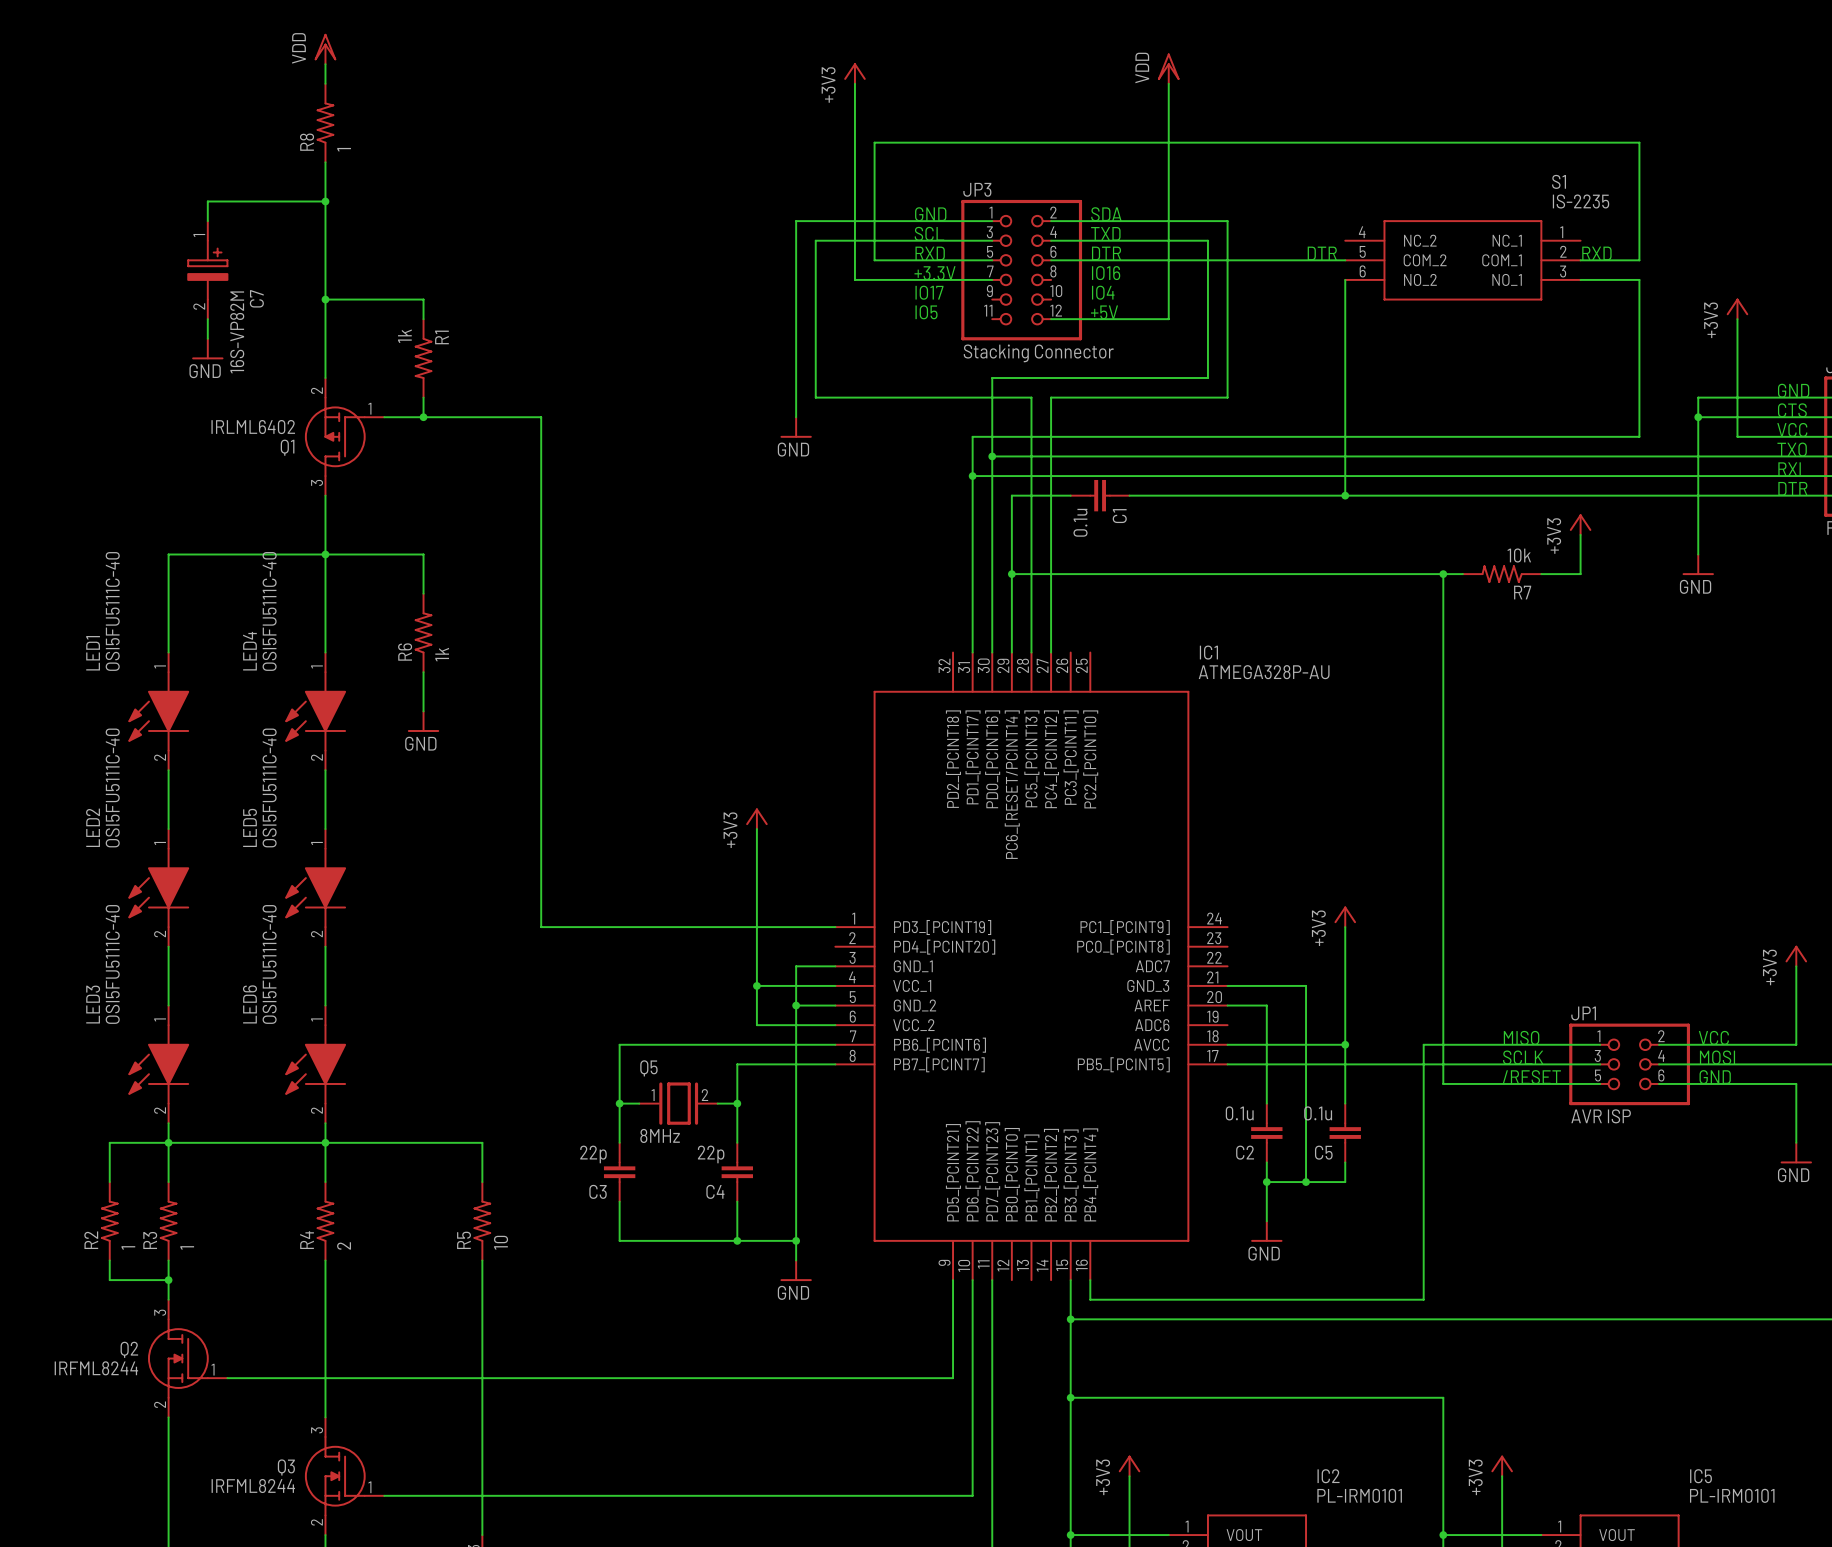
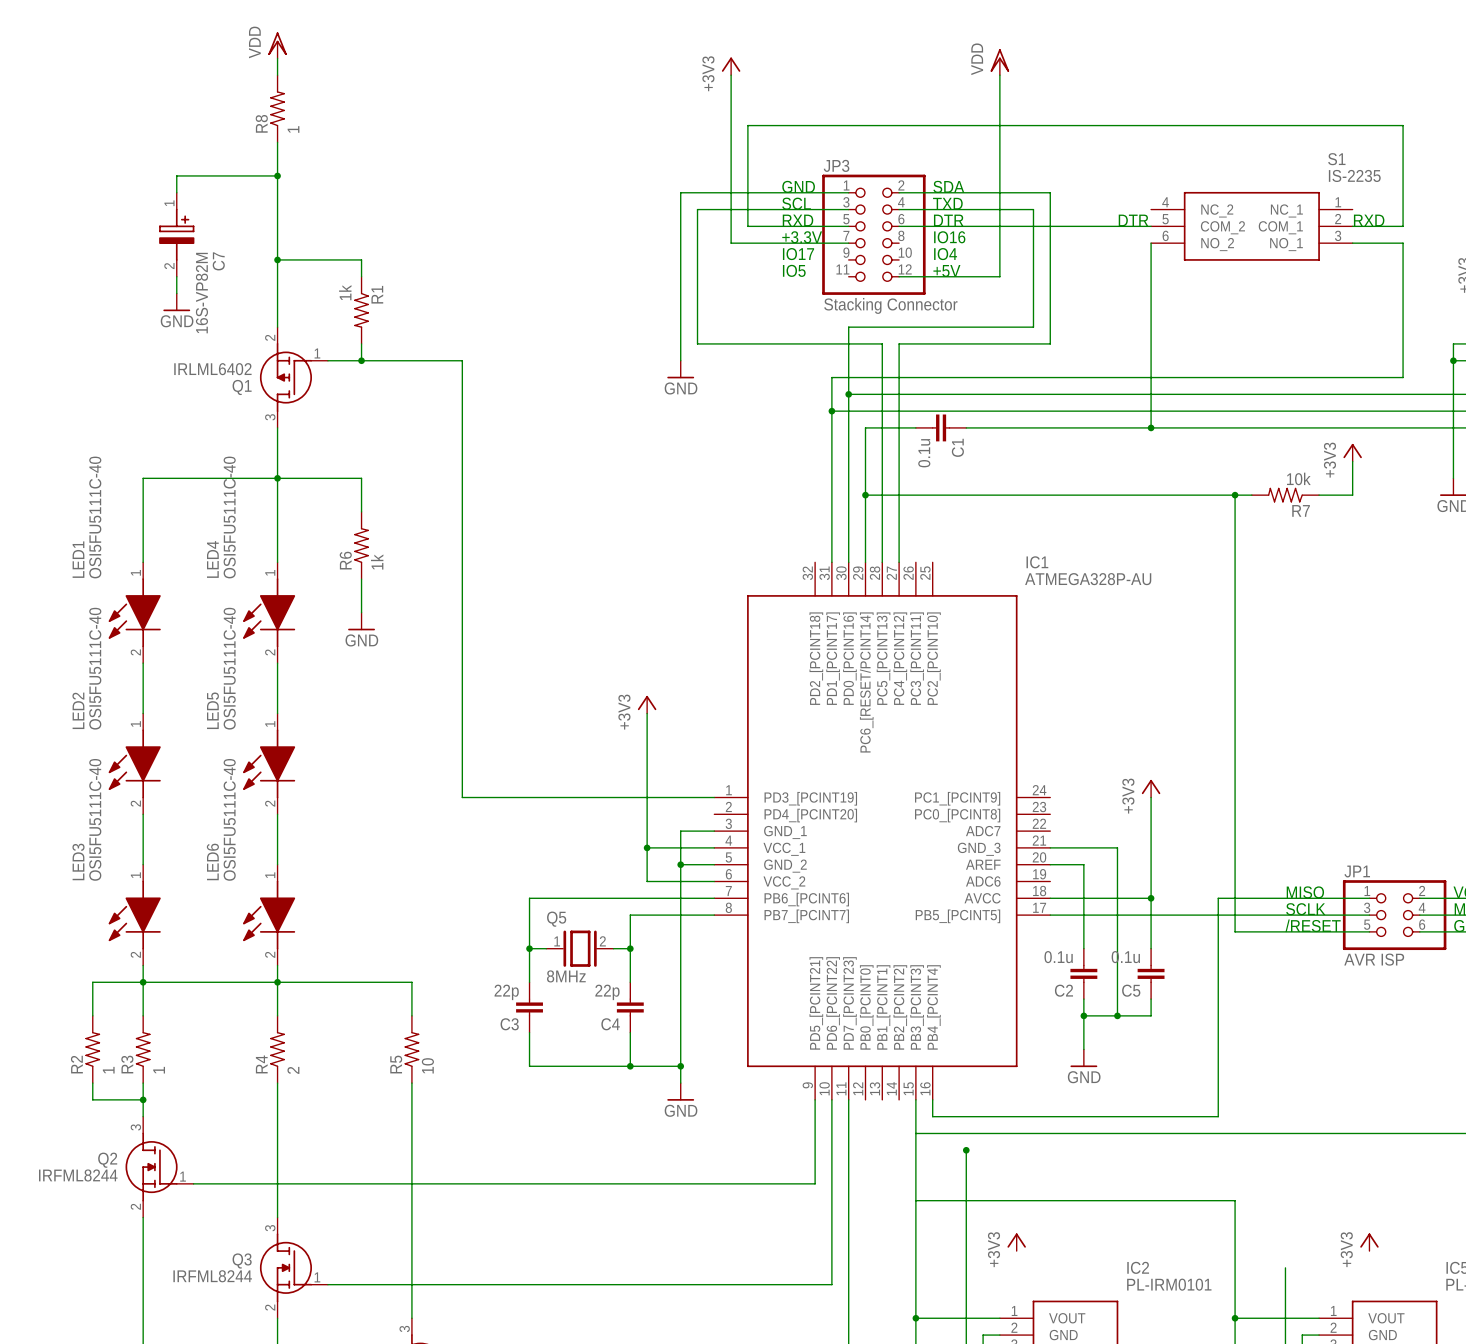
junction: (1070, 1319) -> none
wire: none -> (966, 1150) (966, 1267)
junction: none -> (966, 1150)
junction: (1070, 1397) -> none
power symbol position: +3V3 (1129, 1465) -> +3V3 (1016, 1242)
power symbol position: +3V3 (1502, 1465) -> +3V3 (1369, 1242)

